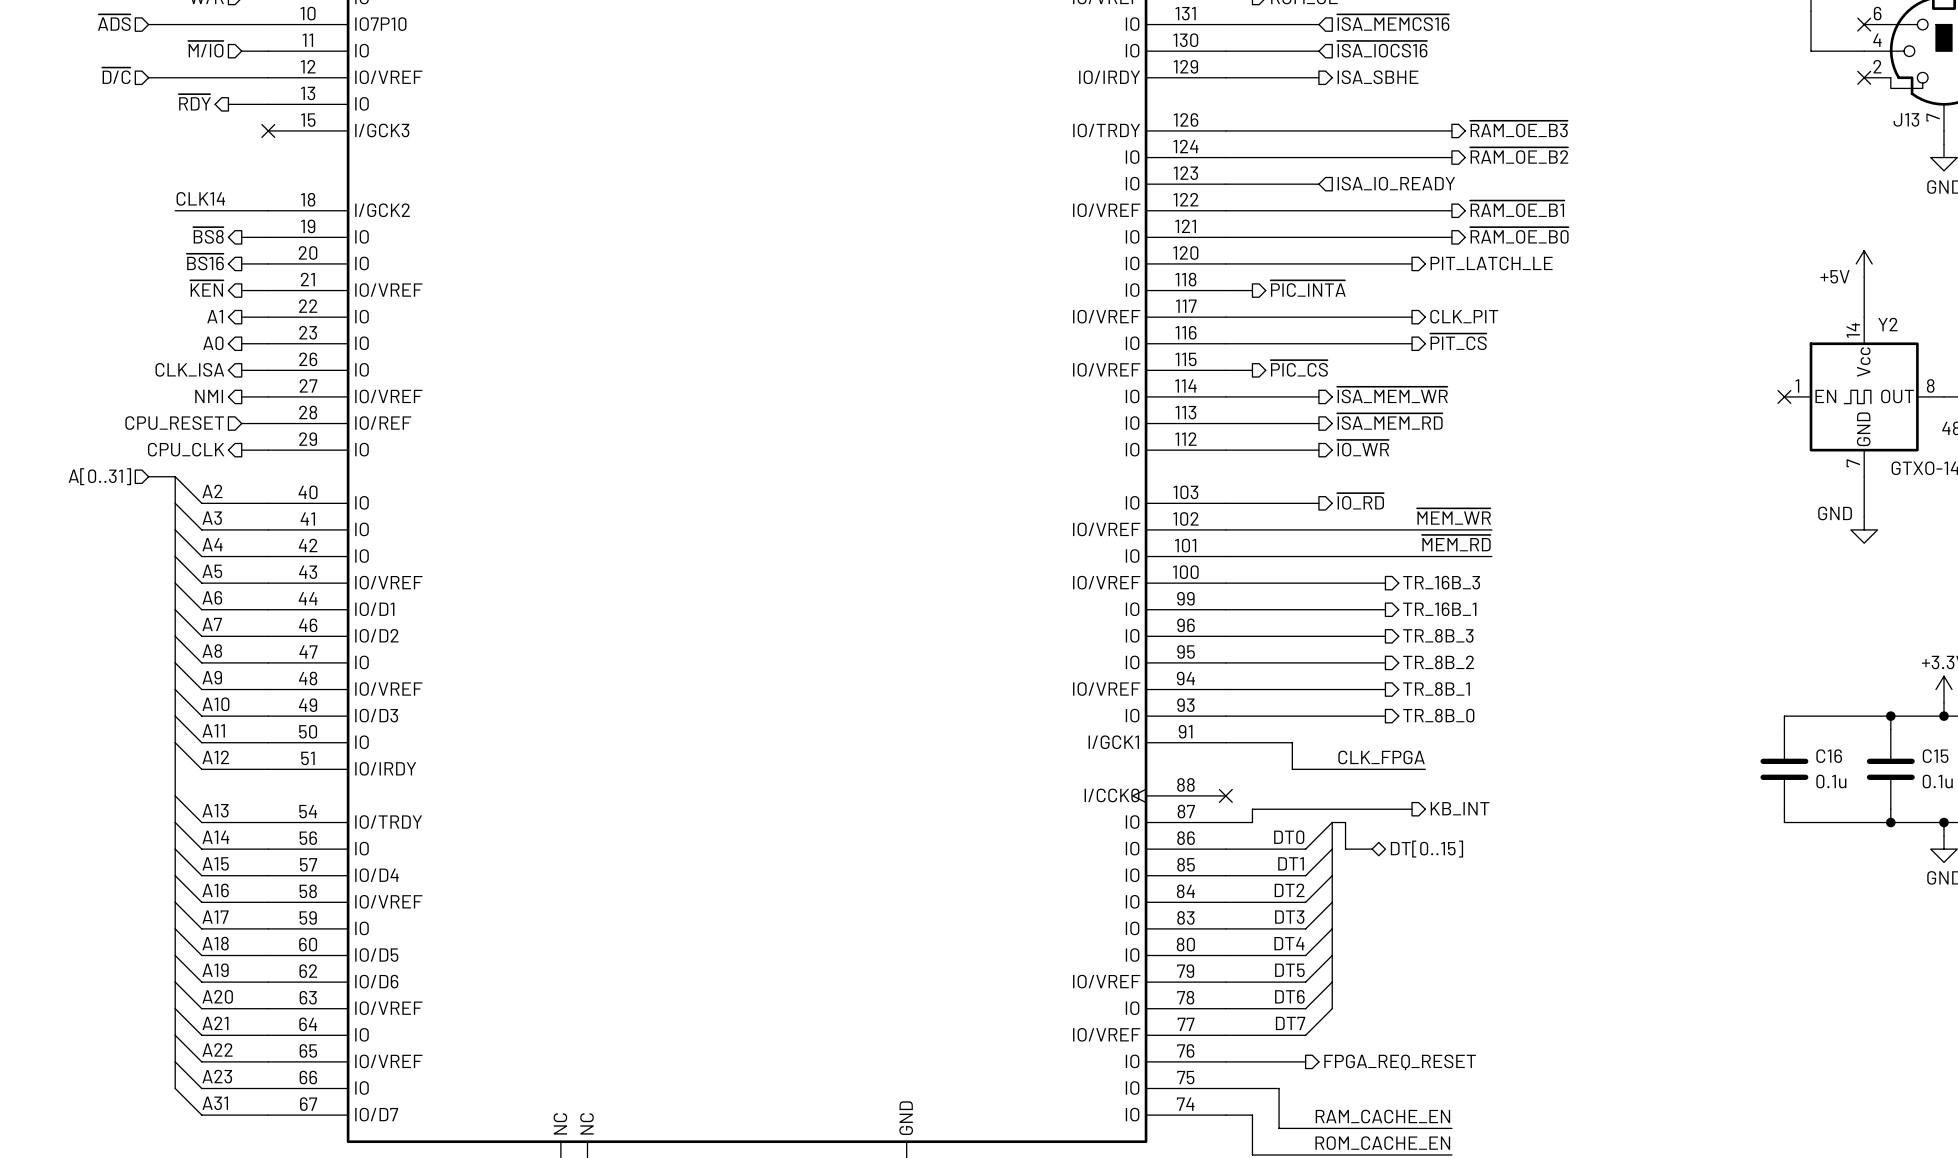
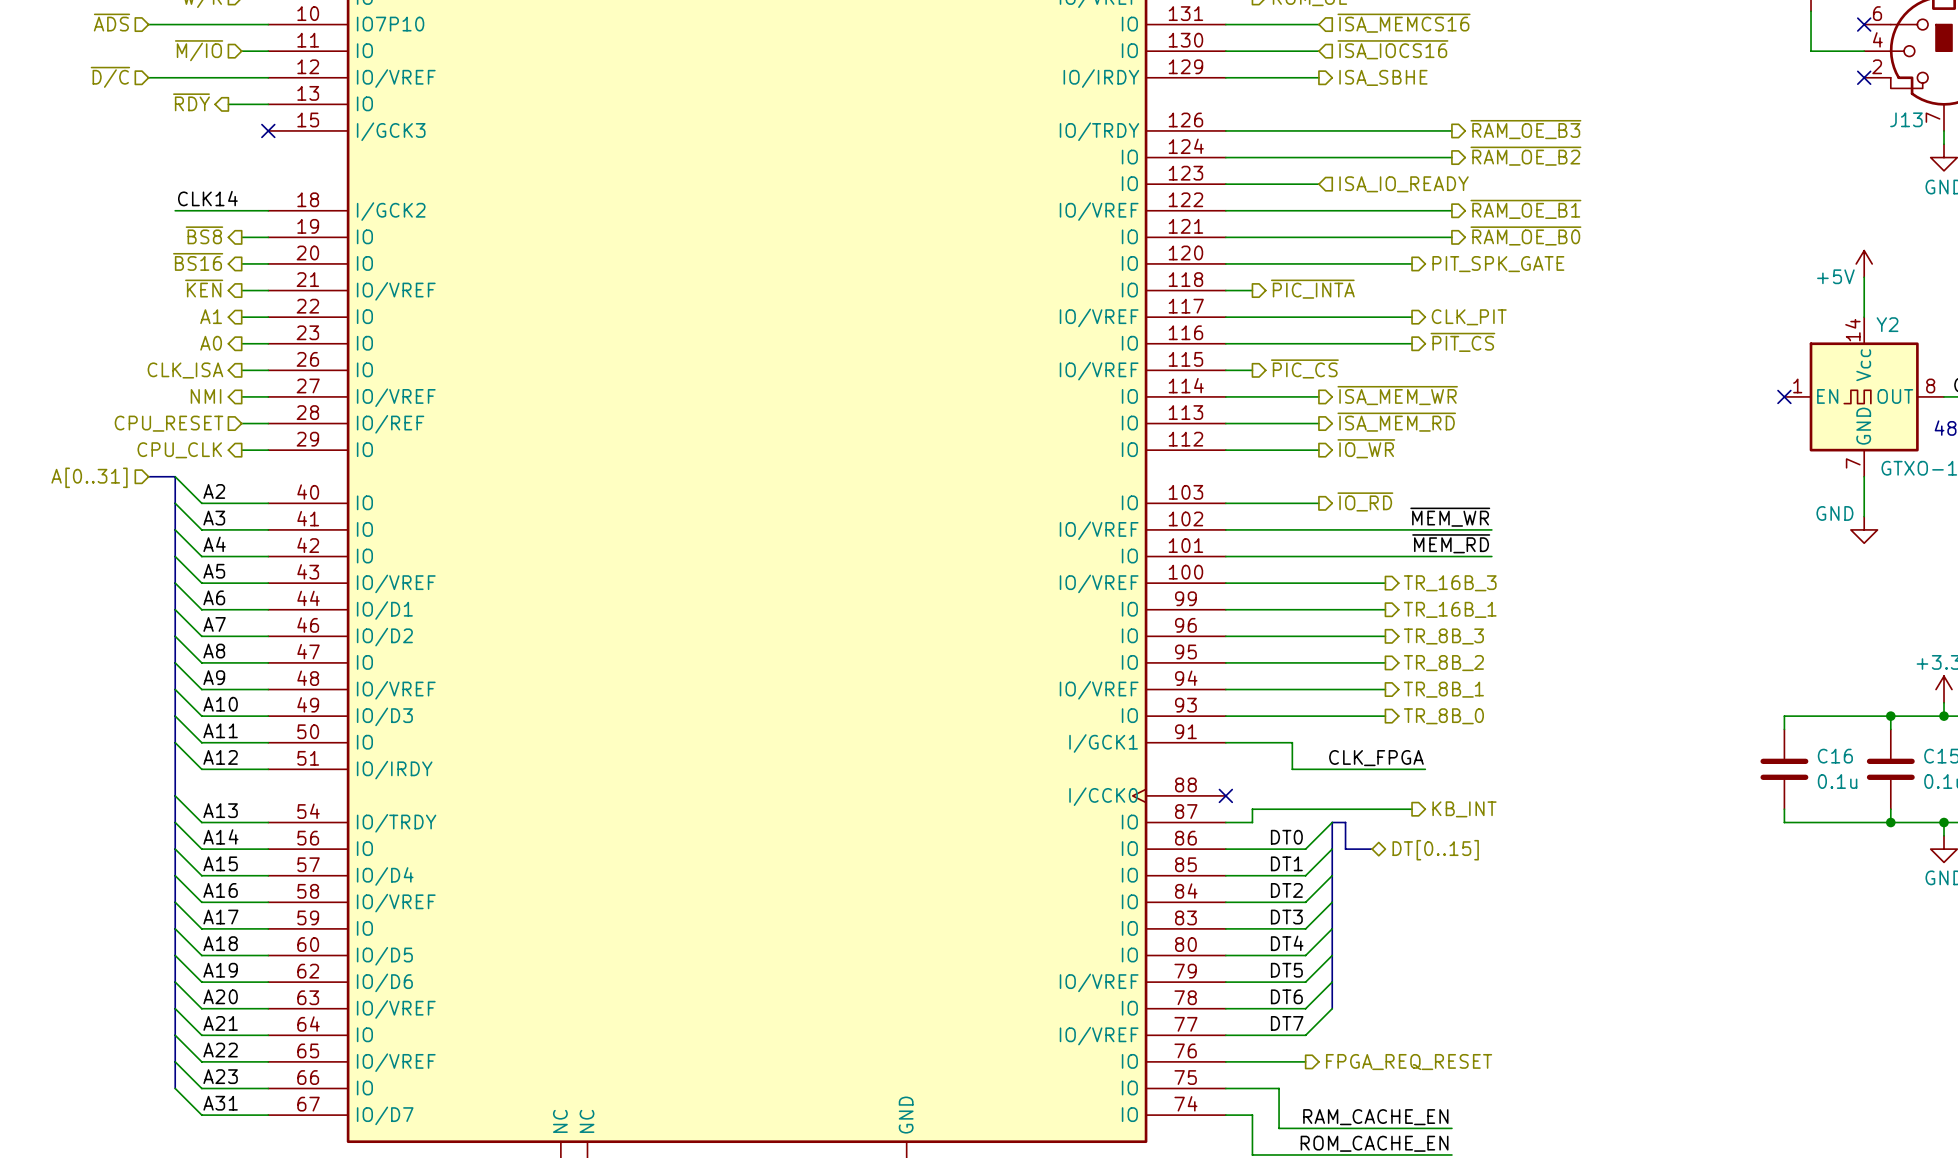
hierarchical label: PIT_LATCH_LE (1491, 263) -> PIT_SPK_GATE (1498, 264)

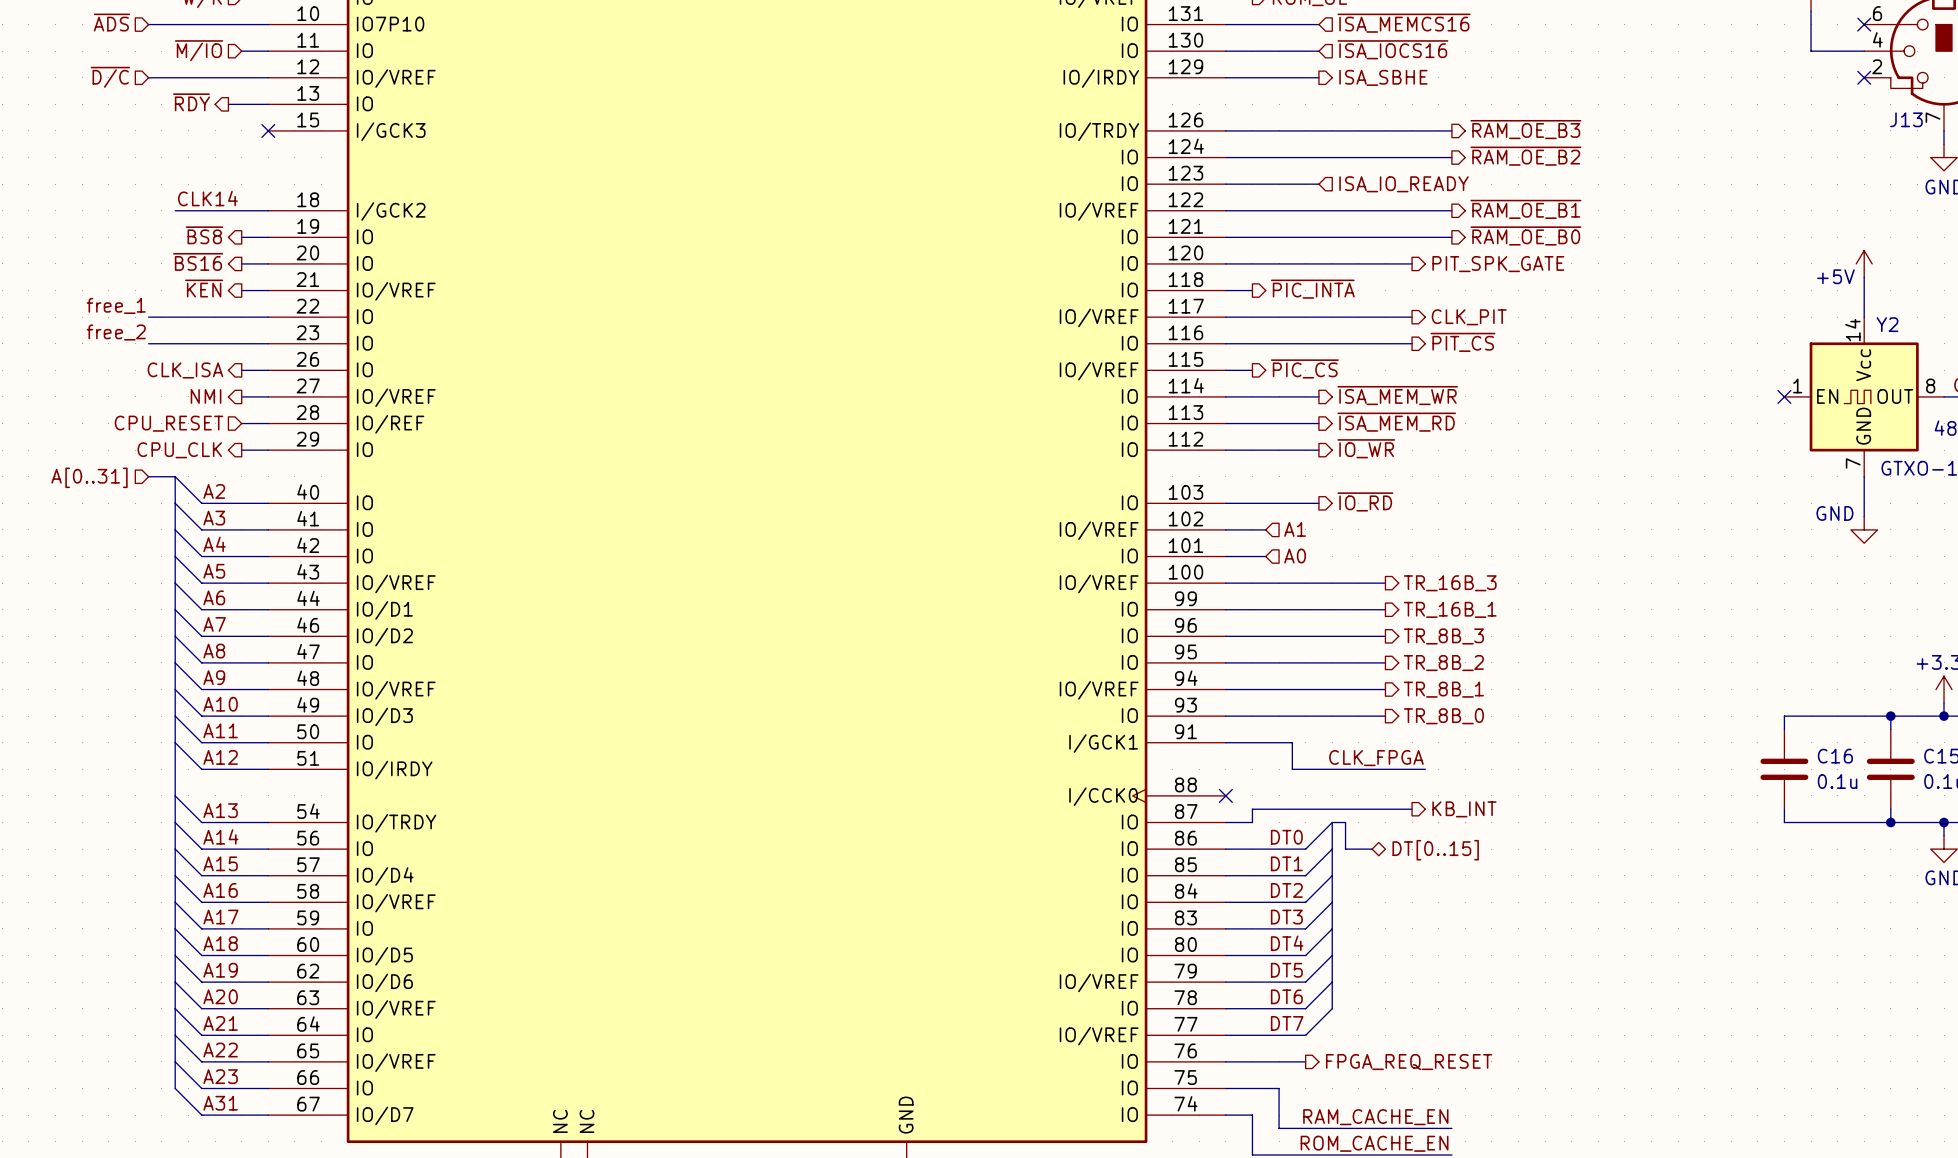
label: none -> free_1 (116, 305)
hierarchical label: A1 (211, 316) -> none
wire: none -> (148, 317) (241, 317)
label: none -> free_2 (116, 332)
wire: none -> (148, 343) (241, 343)
hierarchical label: A0 (211, 343) -> none
label: ~{MEM_WR} (1450, 517) -> none
wire: (1265, 529) (1491, 529) -> none
hierarchical label: none -> A1 (1295, 529)
label: ~{MEM_RD} (1451, 543) -> none
wire: (1265, 556) (1491, 556) -> none
hierarchical label: none -> A0 (1295, 556)

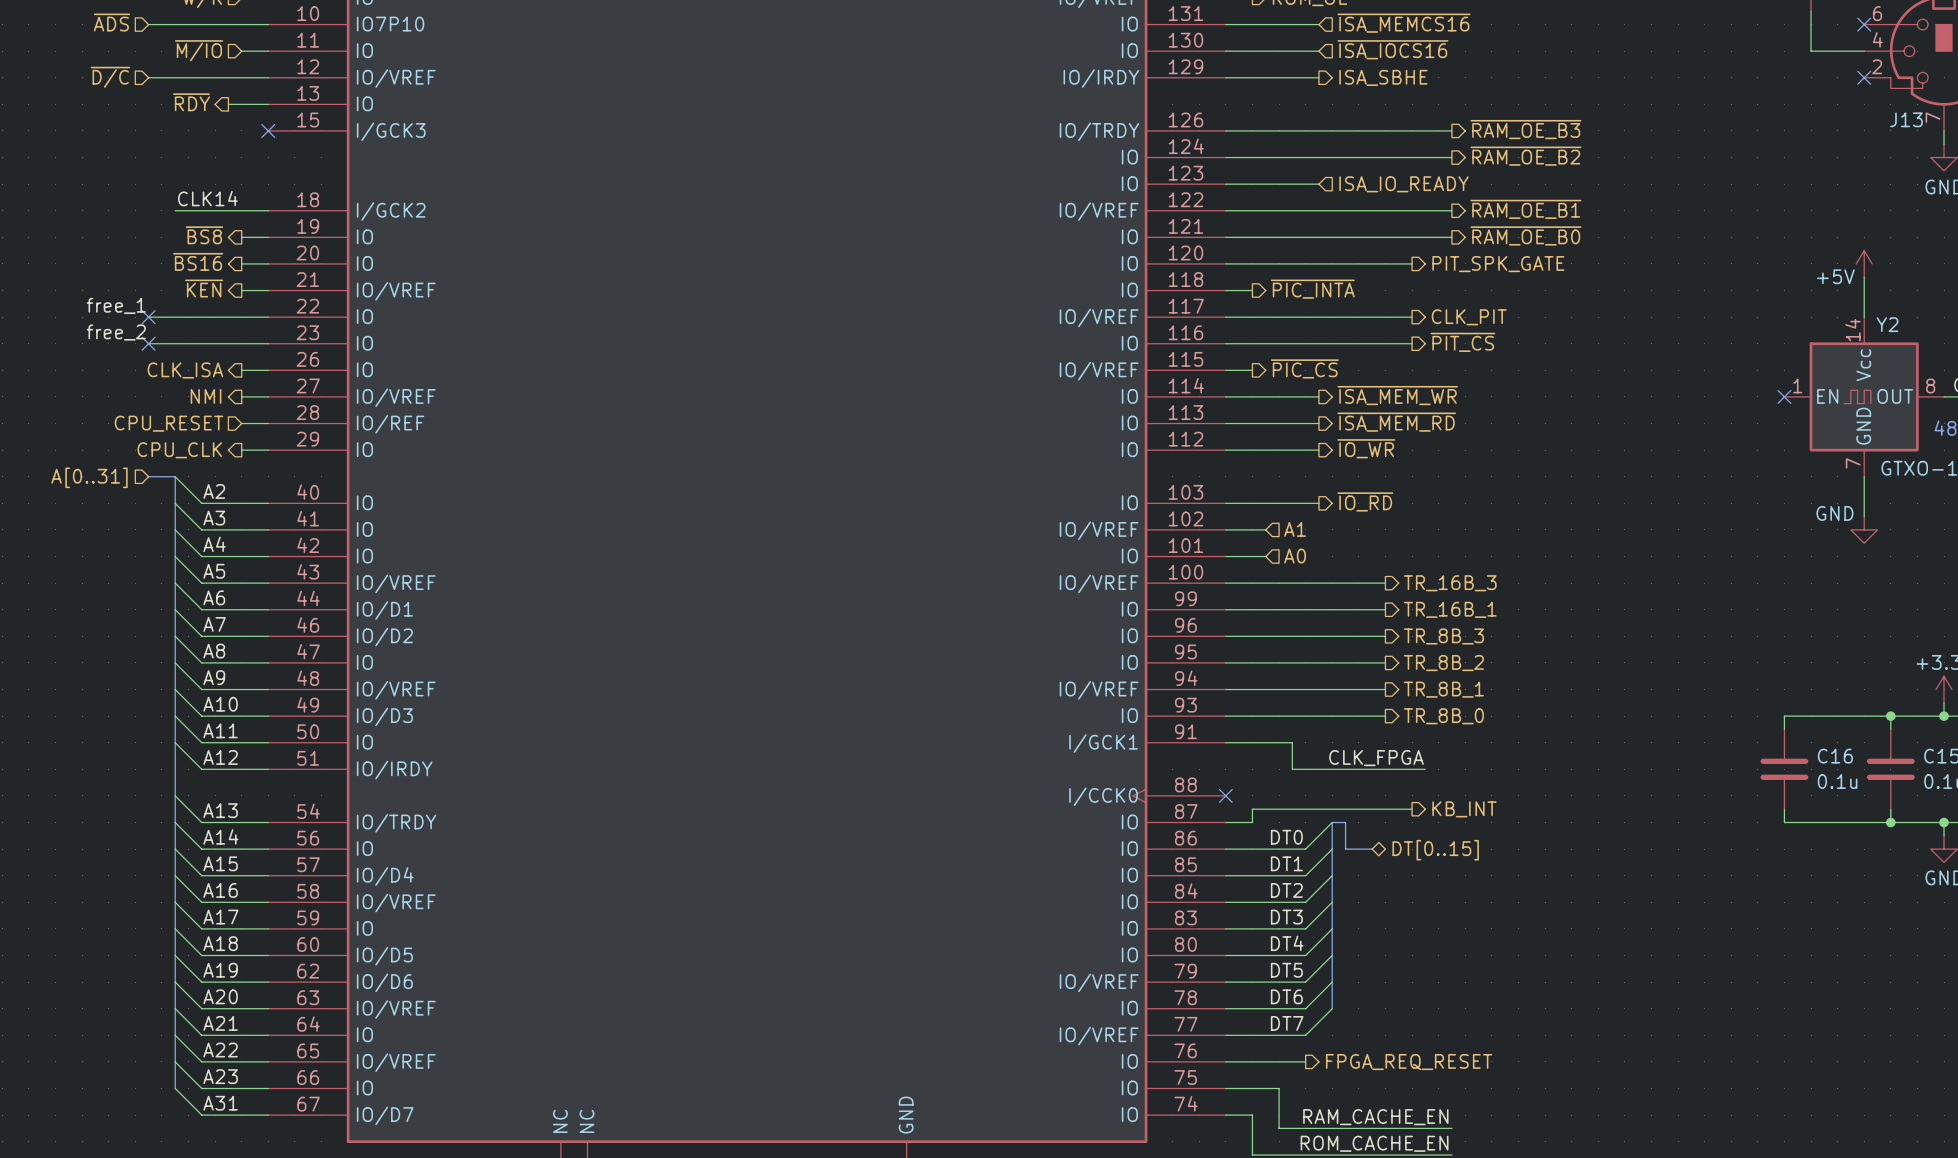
no-connect mark: none -> (148, 317)
no-connect mark: none -> (148, 343)

